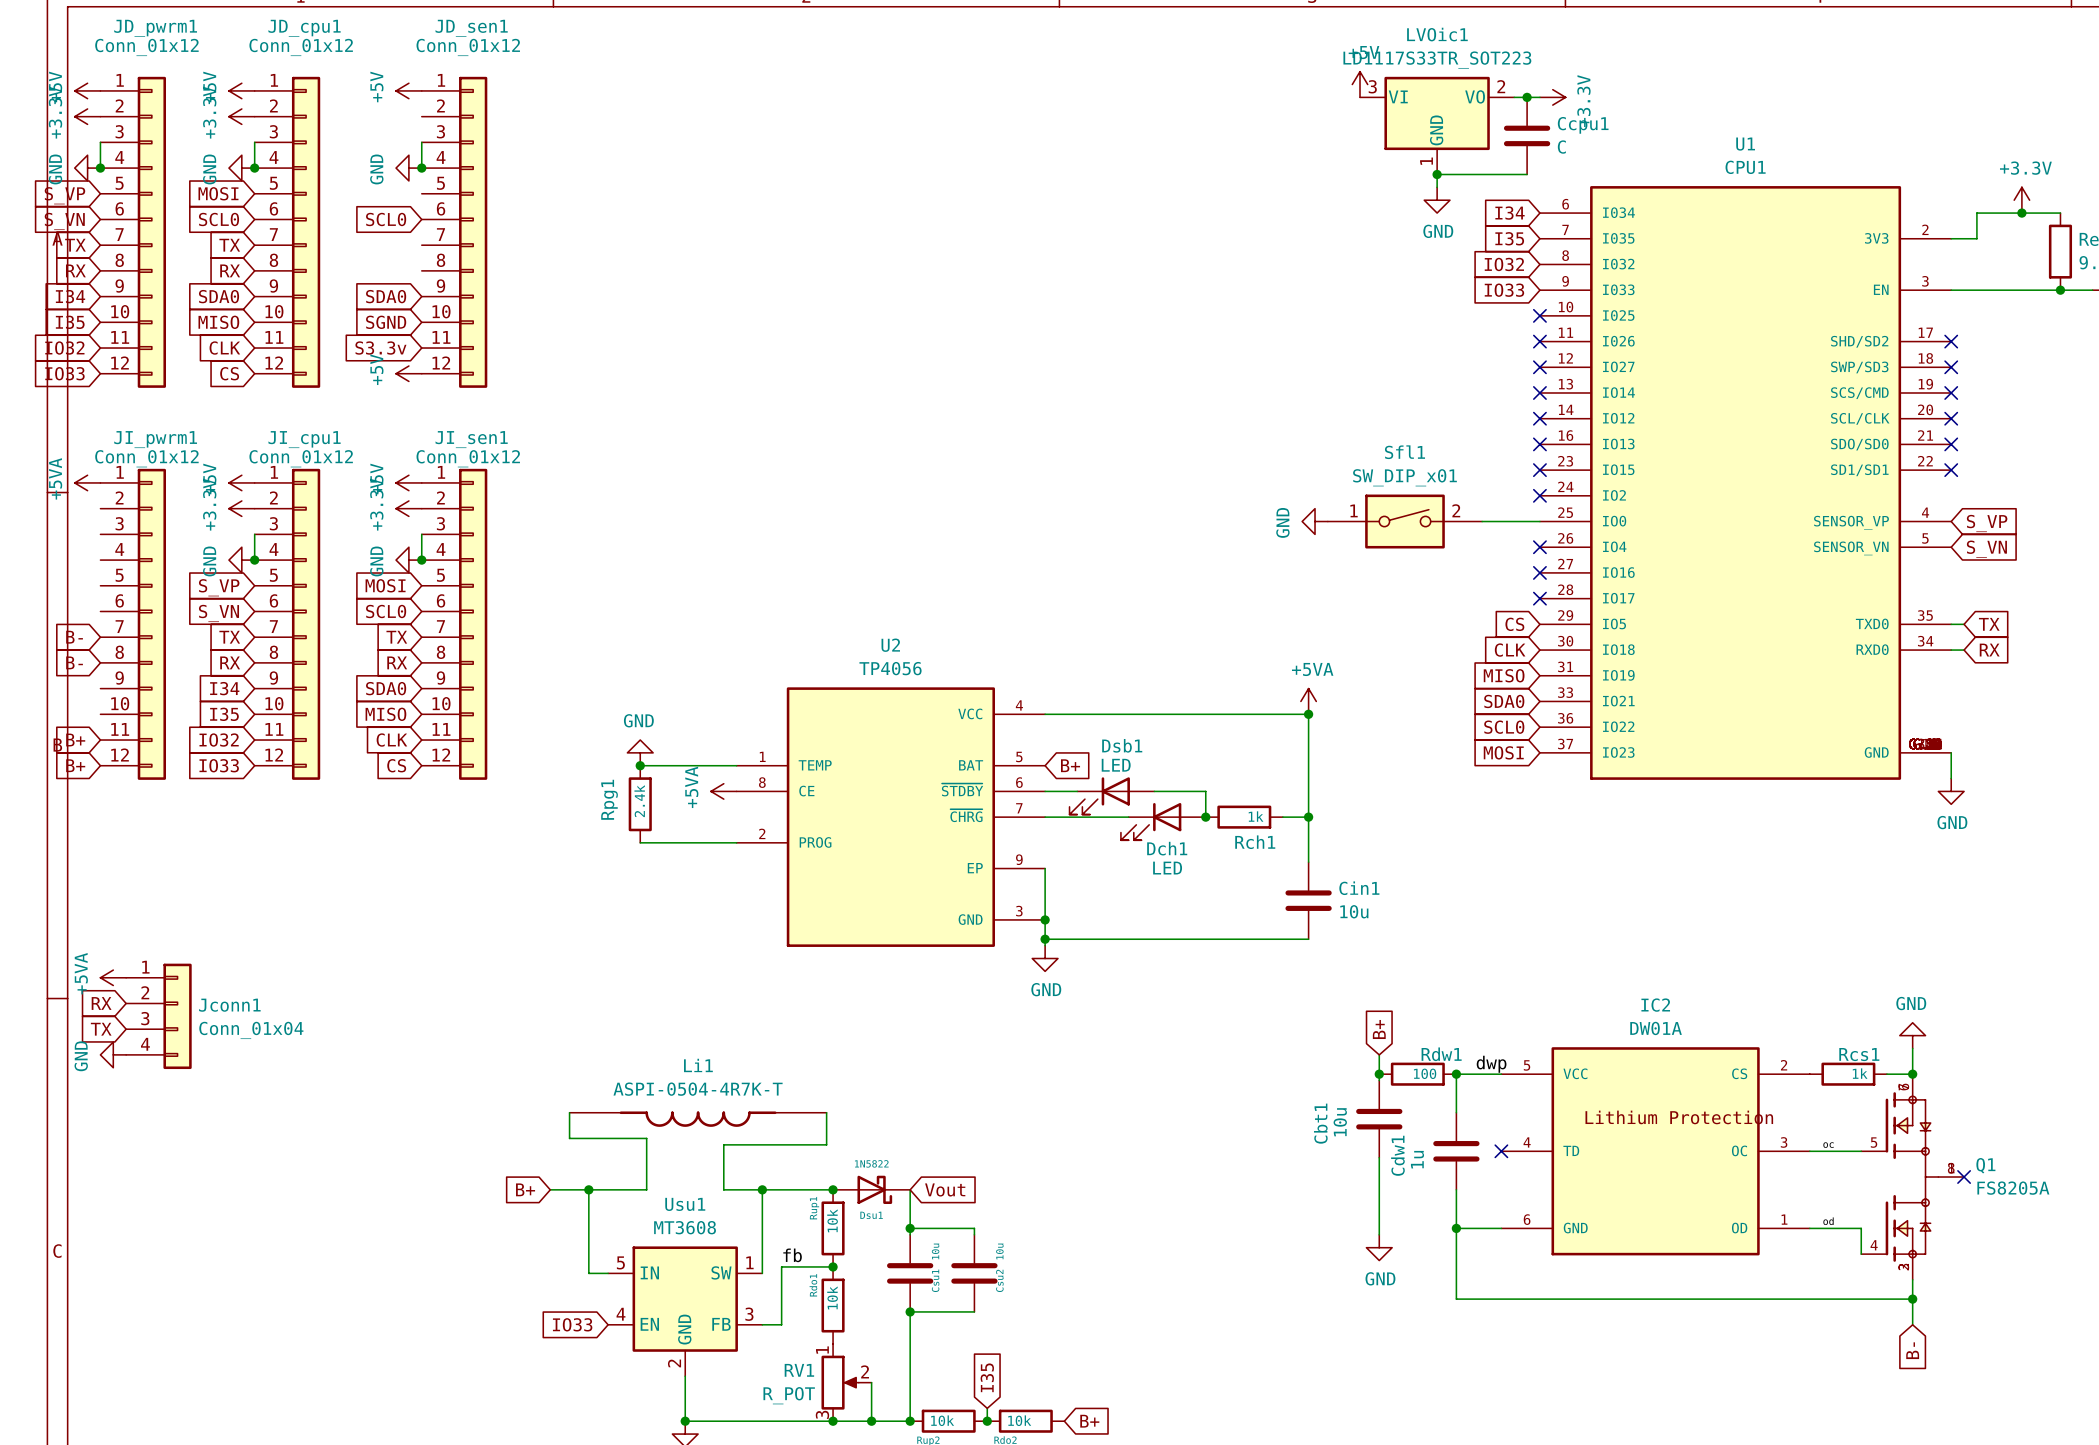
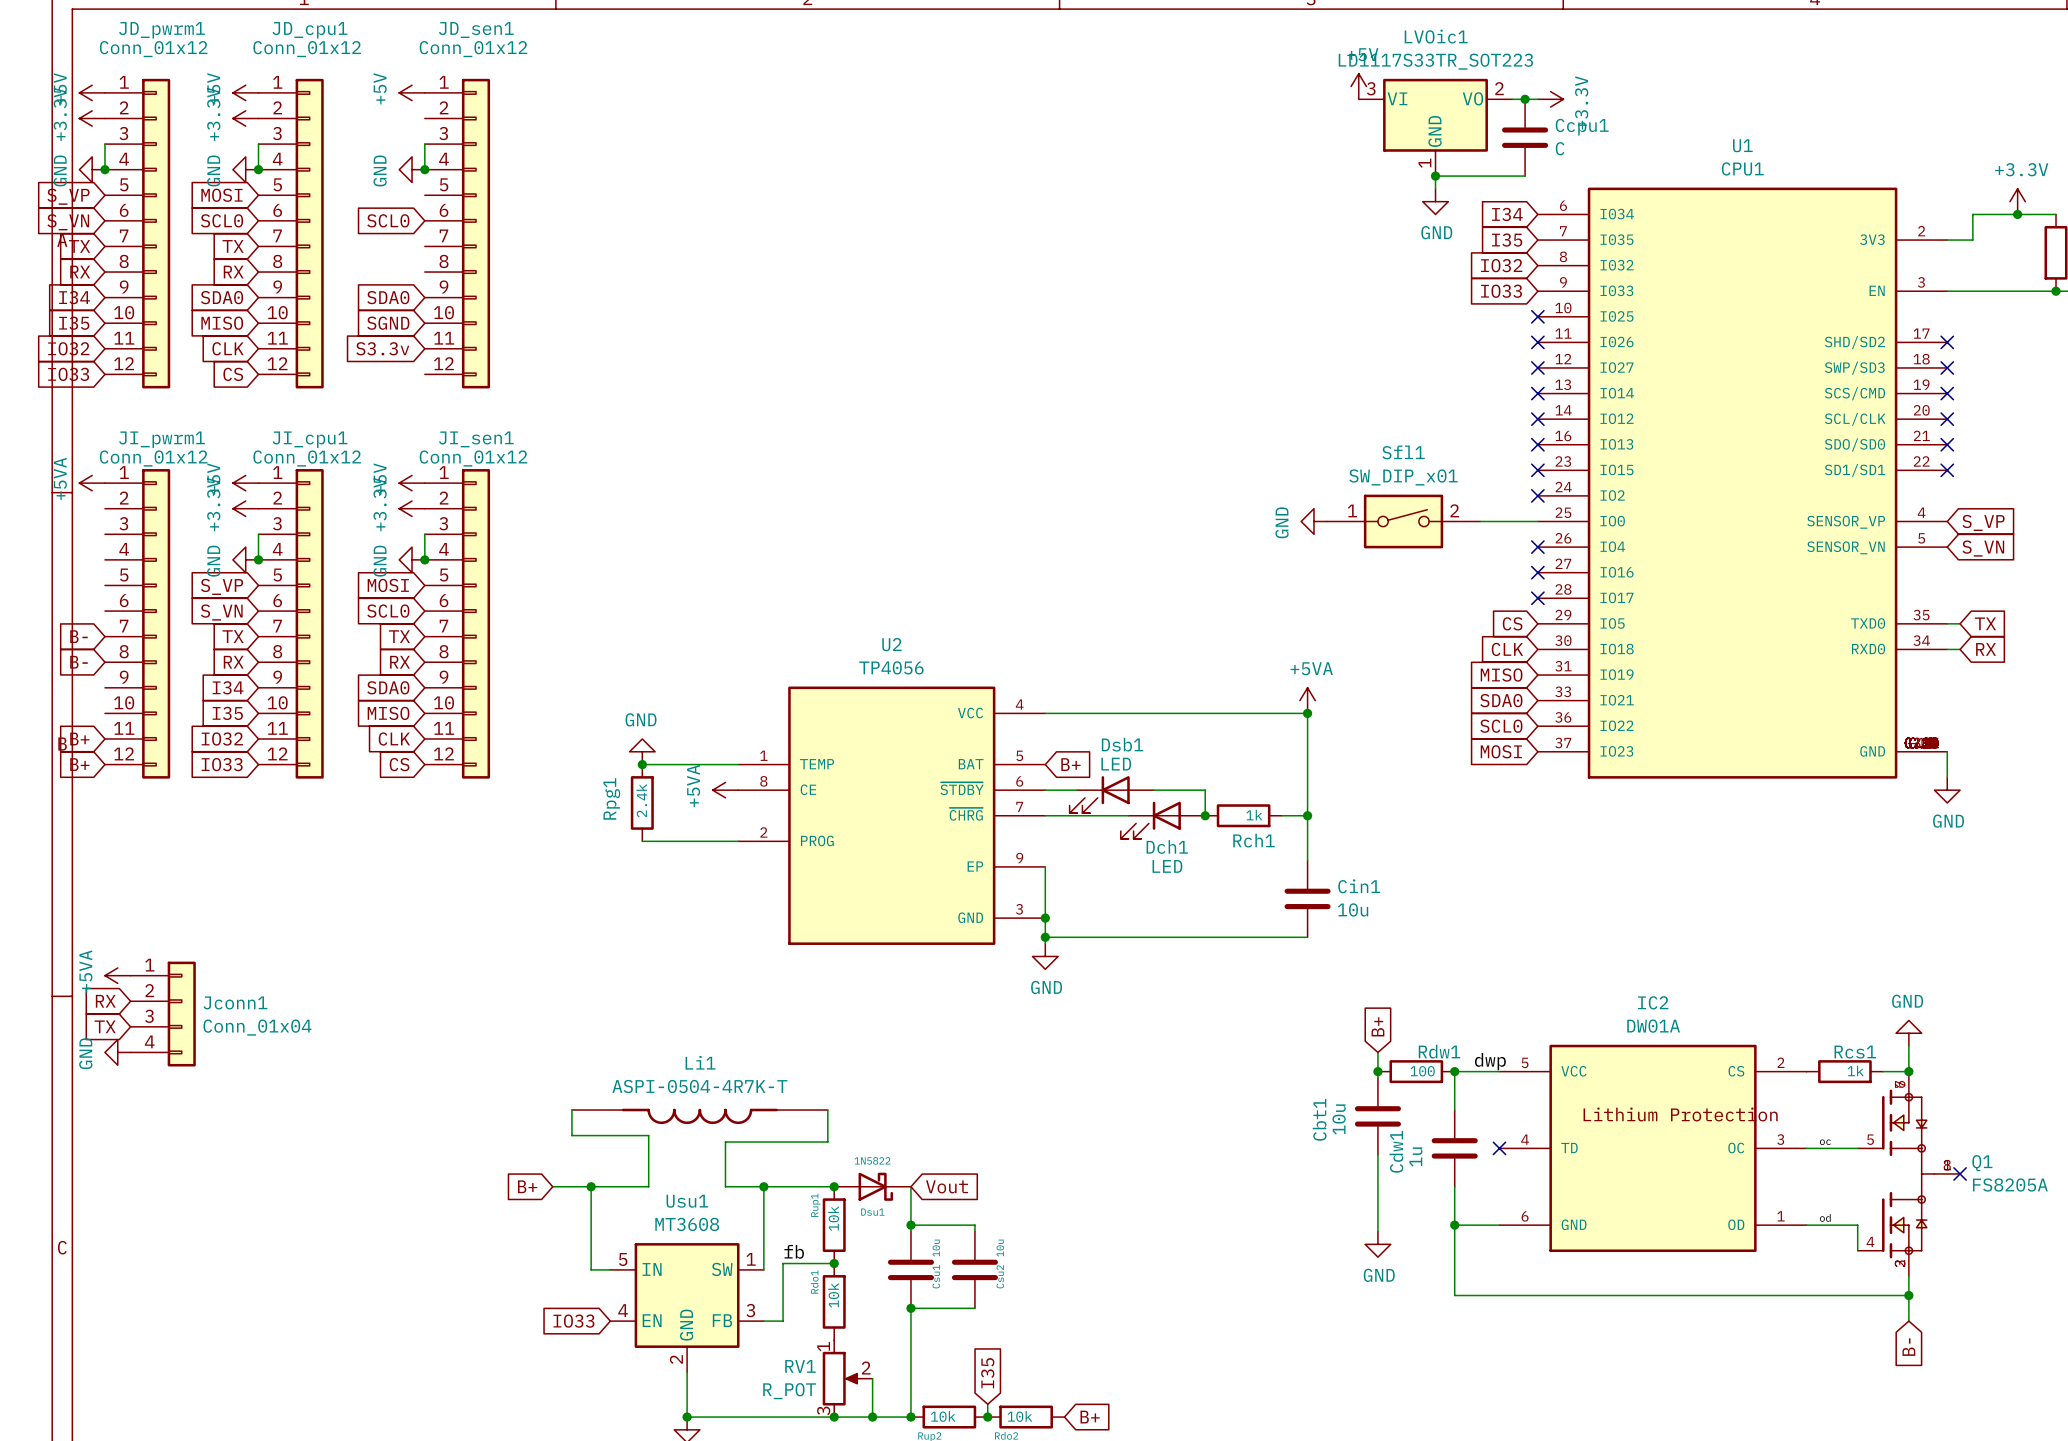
power symbol: +5V (408, 373) -> none

